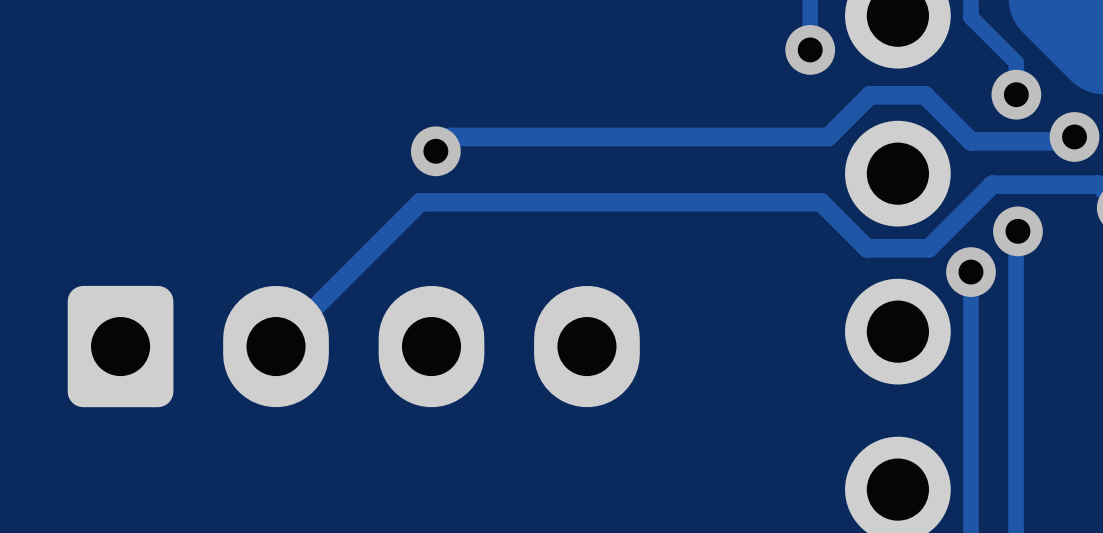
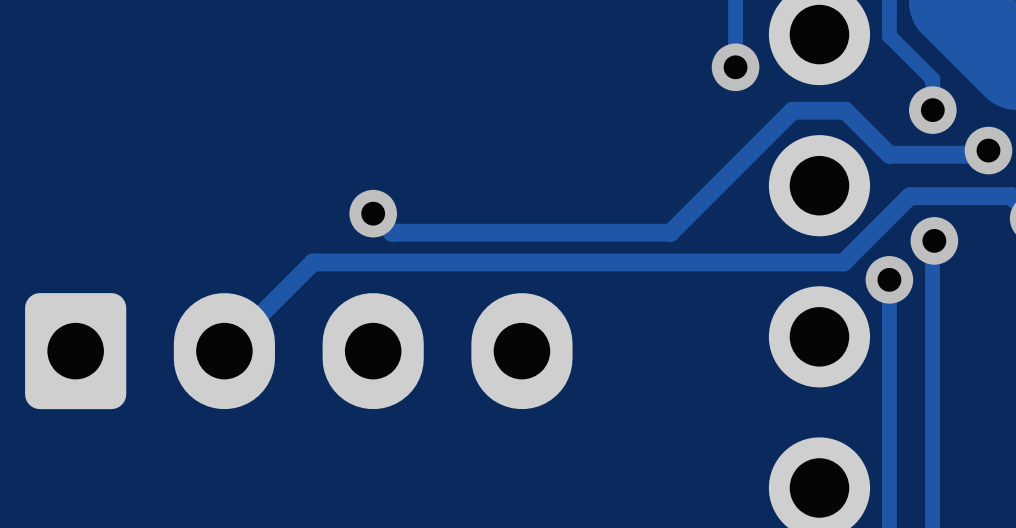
track: (828, 136) (450, 136) (435, 151) -> (752, 150) (670, 232) (392, 232) (373, 213)
via position: (435, 151) -> (373, 213)
track: (928, 248) (866, 248) (820, 202) (420, 202) (368, 253) -> (849, 257) (843, 262) (313, 262)

